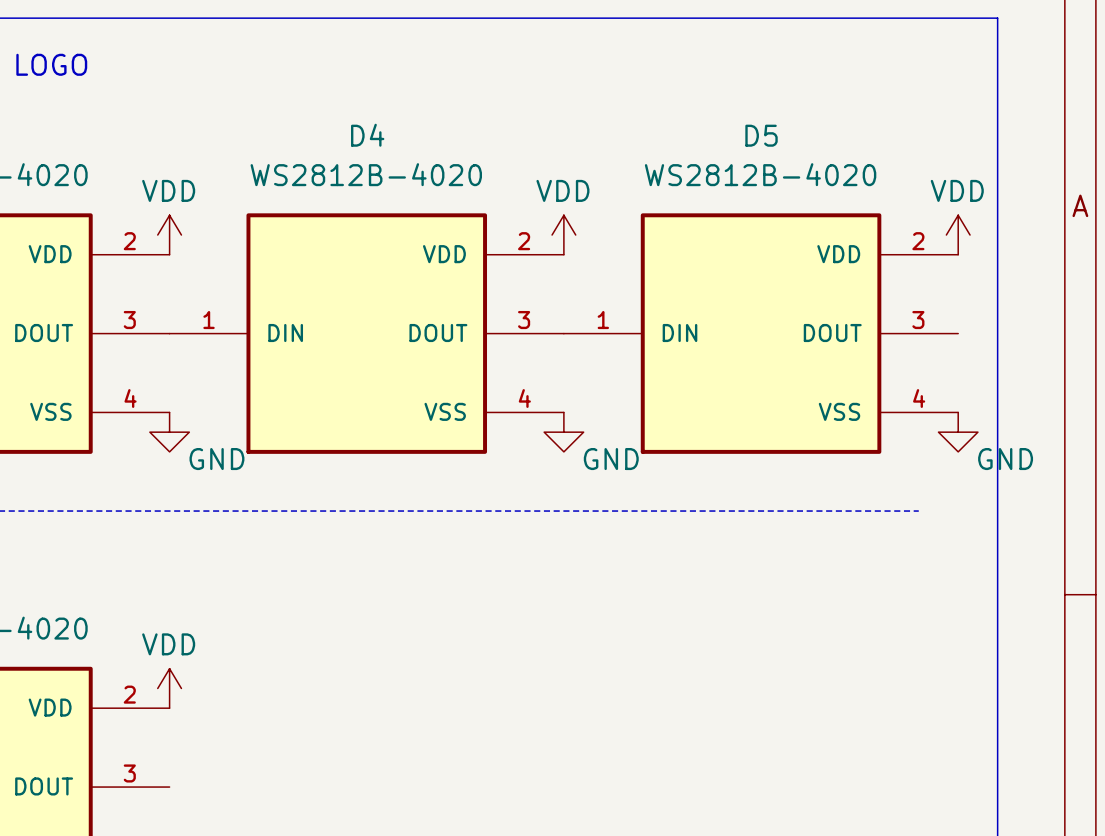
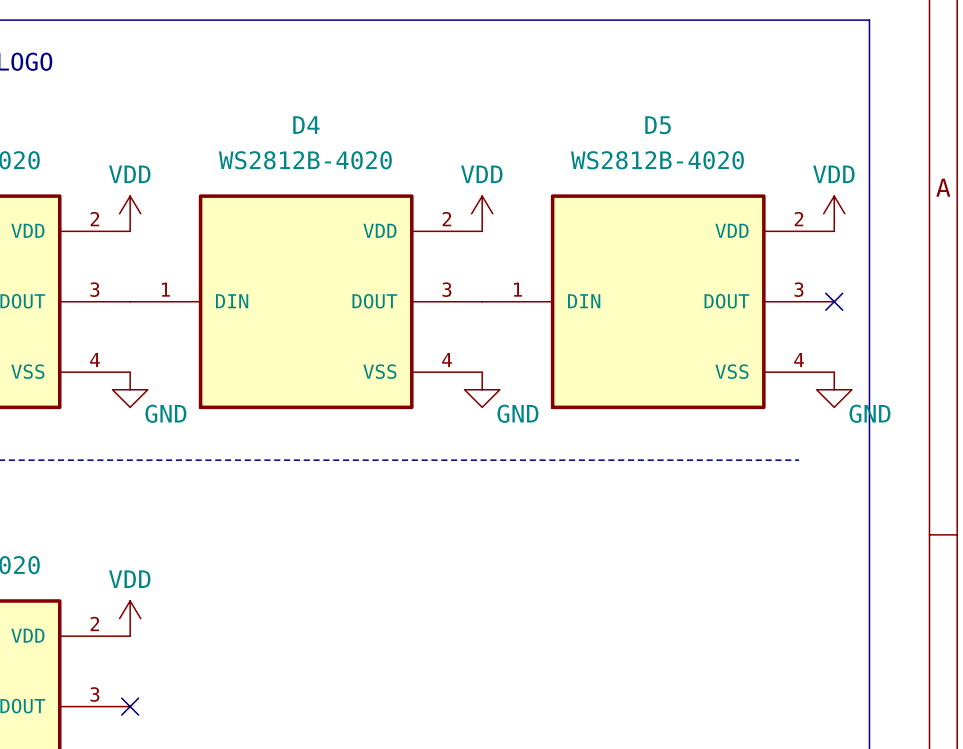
no-connect mark: none -> (834, 301)
no-connect mark: none -> (130, 706)

